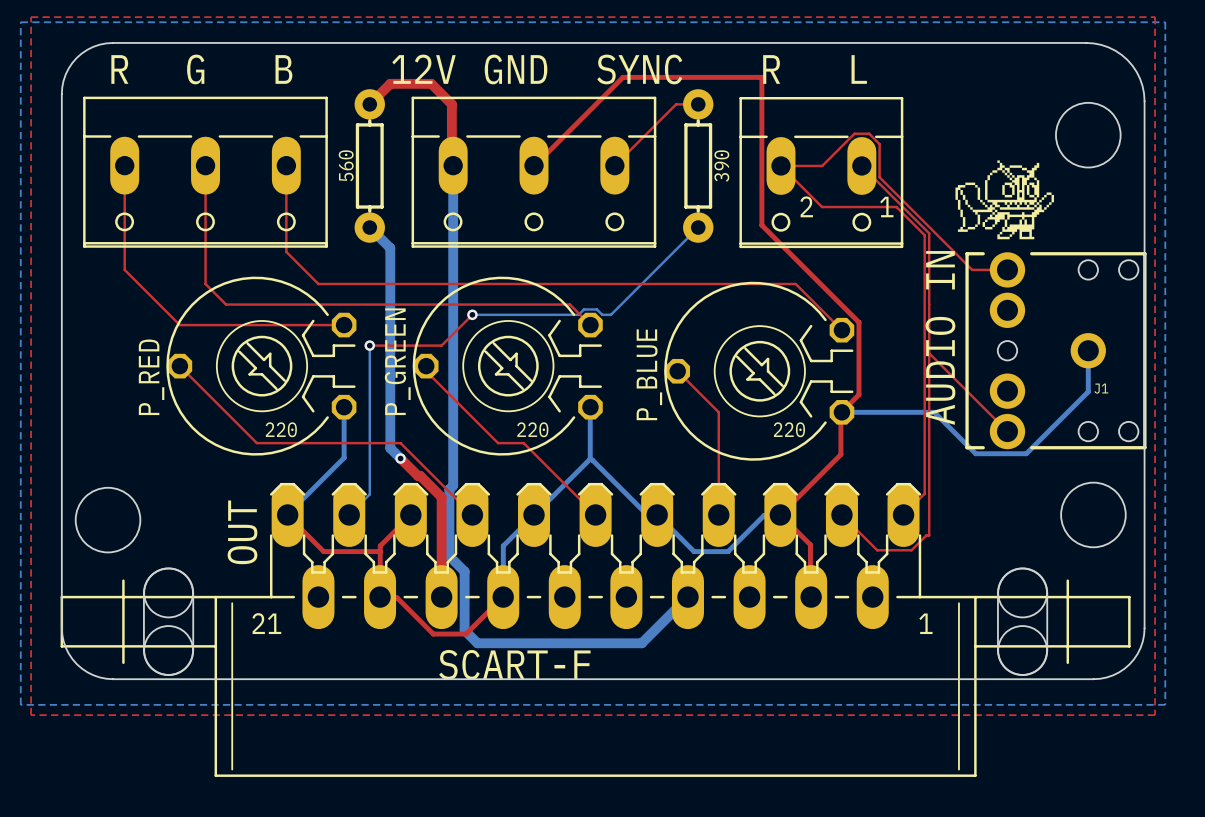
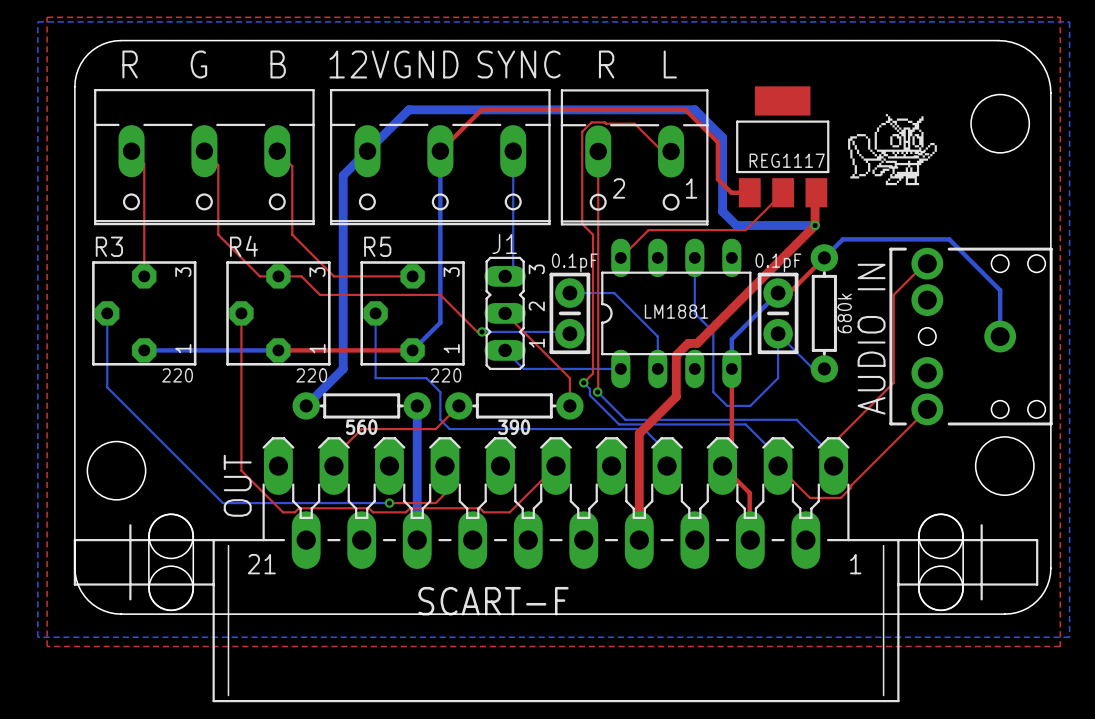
text position: 12V (423, 69) -> 12V (359, 64)
text position: GND (516, 69) -> GND (426, 64)
text position: SYNC (639, 69) -> SYNC (519, 64)
text position: R (771, 69) -> R (606, 64)
text position: L (859, 69) -> L (670, 64)
top track: (369, 104) (390, 83) (431, 83) (451, 104) (453, 165) -> none
top track: (698, 104) (676, 104) (614, 165) -> none
drawing: none -> [848, 114, 937, 186]
part: none -> REG1117 (782, 146)
drawing: [955, 160, 1055, 240] -> none
top track: (124, 165) (124, 269) (179, 325) (333, 325) -> (131, 151) (144, 163) (144, 276)
top track: (205, 165) (205, 284) (226, 304) (267, 304) -> (204, 151) (218, 165) (218, 234) (259, 276)
top track: (286, 165) (286, 251) (318, 284) (795, 284) (841, 330) -> (277, 151) (292, 166) (292, 234) (333, 276)
part value position: 560 (346, 165) -> 560 (361, 427)
part rotation: 0° (369, 165) -> 90° clockwise (361, 405)
part position: (369, 165) -> (361, 405)
bottom track: (453, 165) (453, 485) (449, 489) (449, 556) (464, 571) (464, 630) (477, 643) (641, 643) (687, 597) -> none
bottom track: none -> (440, 151) (440, 322) (412, 350)
top track: none -> (440, 151) (481, 109) (685, 109) (717, 142) (717, 179) (731, 192) (749, 192)
top track: (534, 165) (623, 77) (761, 77) (761, 225) (858, 322) (858, 394) (840, 412) (840, 454) (790, 504) -> (731, 368) (731, 456)
bottom track: none -> (513, 151) (513, 268) (505, 276)
top track: none -> (598, 151) (597, 392)
part rotation: 0° (698, 165) -> 90° clockwise (514, 405)
part position: (698, 165) -> (514, 405)
top track: none -> (671, 151) (662, 151) (634, 123) (591, 122) (582, 131) (582, 223) (593, 234) (593, 373) (583, 382)
top track: (861, 165) (929, 233) (929, 535) (922, 538) -> (927, 409) (851, 487)
part position: (533, 172) -> (440, 157)
part position: (821, 172) -> (634, 157)
drawing shape: [955, 192, 958, 195] -> [874, 174, 882, 177]
drawing position: (1012, 201) -> (899, 150)
drawing position: (1017, 208) -> (903, 157)
drawing position: (982, 210) -> (872, 159)
top track: none -> (783, 192) (745, 230) (648, 230) (620, 257)
top track: none -> (816, 192) (815, 225) (697, 343) (688, 343) (676, 355) (676, 396) (639, 433) (639, 540)
drawing position: (1021, 215) -> (908, 164)
drawing position: (996, 218) -> (884, 166)
drawing position: (1021, 225) -> (908, 172)
bottom track: (369, 227) (390, 248) (390, 448) (400, 458) -> none
bottom track: (698, 227) (610, 314) (602, 314) (596, 309) (584, 309) (578, 314) (472, 314) -> none
drawing position: (1020, 228) -> (906, 175)
bottom track: none -> (815, 225) (736, 225) (722, 211) (722, 137) (694, 109) (408, 109) (343, 175) (343, 368) (306, 405)
via: none -> (815, 225)
text: none -> J1 (504, 244)
top track: (1007, 269) (972, 269) (879, 177) (879, 144) (869, 133) (854, 133) (822, 165) (781, 165) (822, 207) (896, 207) (924, 235) (924, 493) (903, 514) -> (927, 263) (924, 263) (893, 294) (893, 382) (833, 442) (833, 466)
bottom track: none -> (694, 257) (694, 313) (713, 331) (713, 392) (727, 405) (750, 405) (778, 378) (778, 333) (813, 368) (824, 368)
bottom track: none -> (824, 257) (842, 239) (949, 239) (1000, 290) (1000, 318)
top track: none -> (824, 257) (789, 293) (778, 293)
text: none -> 0.1pF (574, 262)
text: none -> 0.1pF (778, 262)
top track: (313, 304) (349, 304) -> (301, 276) (320, 294)
top track: (436, 304) (569, 304) (590, 325) -> none
top track: (472, 314) (441, 345) (369, 345) -> none
via position: (472, 314) -> (482, 331)
bottom track: none -> (569, 293) (614, 293) (657, 336) (657, 368)
bottom track: none -> (778, 293) (731, 339) (731, 368)
top track: none -> (329, 294) (440, 294) (477, 331) (482, 331)
text position: AUDIO IN (940, 337) -> AUDIO IN (871, 339)
text: none -> LM1881 (676, 311)
bottom track: none -> (107, 313) (107, 387) (222, 503) (389, 503)
R3: none -> (144, 313)
R4: none -> (278, 313)
bottom track: (369, 345) (369, 494) (349, 514) -> none
via: (369, 345) -> none
bottom track: none -> (375, 313) (375, 378) (426, 378) (440, 392) (440, 419) (449, 429) (643, 429) (667, 452) (667, 466)
R5: none -> (412, 313)
top track: none -> (505, 313) (569, 378) (569, 405)
part: none -> (505, 313)
part: none -> (569, 313)
part: none -> (676, 313)
part: none -> (778, 313)
part: none -> (824, 313)
text: none -> 680k (844, 313)
J1: (1055, 350) -> none
top track: (929, 353) (1007, 431) -> none
top track: (179, 366) (256, 443) (400, 443) (472, 514) -> (389, 503) (435, 503) (444, 493) (444, 466)
P_RED: (261, 366) -> none
top track: (426, 366) (426, 371) (498, 443) (523, 443) (595, 514) -> (241, 313) (241, 470) (283, 512) (294, 512) (298, 508) (368, 508) (372, 512) (405, 512) (410, 508) (479, 508) (484, 512) (509, 512) (556, 466)
P_GREEN: (507, 366) -> none
bottom track: none -> (482, 331) (568, 331) (569, 333)
top track: (677, 371) (718, 412) (718, 514) -> none
P_BLUE: (759, 371) -> none
part: none -> (971, 336)
bottom track: (1088, 371) (1088, 391) (1026, 453) (975, 453) (934, 412) (841, 412) -> none
bottom track: none -> (144, 350) (278, 350)
top track: none -> (278, 350) (412, 350)
bottom track: none -> (505, 350) (523, 368) (620, 368)
bottom track: (344, 407) (344, 457) (287, 514) -> none
bottom track: (590, 407) (590, 459) -> none
text: none -> 220 (177, 375)
bottom track: none -> (583, 382) (589, 388) (589, 395) (619, 424) (745, 424) (778, 456) (778, 466)
via: none -> (583, 382)
text position: 220 (281, 429) -> 220 (311, 375)
text position: 220 (532, 429) -> 220 (445, 375)
text: 220 (789, 429) -> none
bottom track: none -> (597, 392) (625, 419) (796, 419) (833, 456) (833, 466)
via: none -> (597, 392)
bottom track: none -> (417, 405) (417, 540)
top track: none -> (458, 405) (435, 429) (361, 429) (333, 456) (333, 466)
top track: (400, 458) (441, 497) (441, 597) -> none
via: (400, 458) -> none
bottom track: (590, 459) (503, 545) (503, 597) -> none
bottom track: (590, 459) (646, 514) (656, 514) (694, 551) (728, 551) (764, 515) (780, 514) -> none
top track: (287, 514) (323, 551) (380, 551) -> none
top track: (410, 514) (380, 545) (380, 597) (397, 597) (433, 634) (466, 634) (503, 597) -> none
via: none -> (389, 503)

